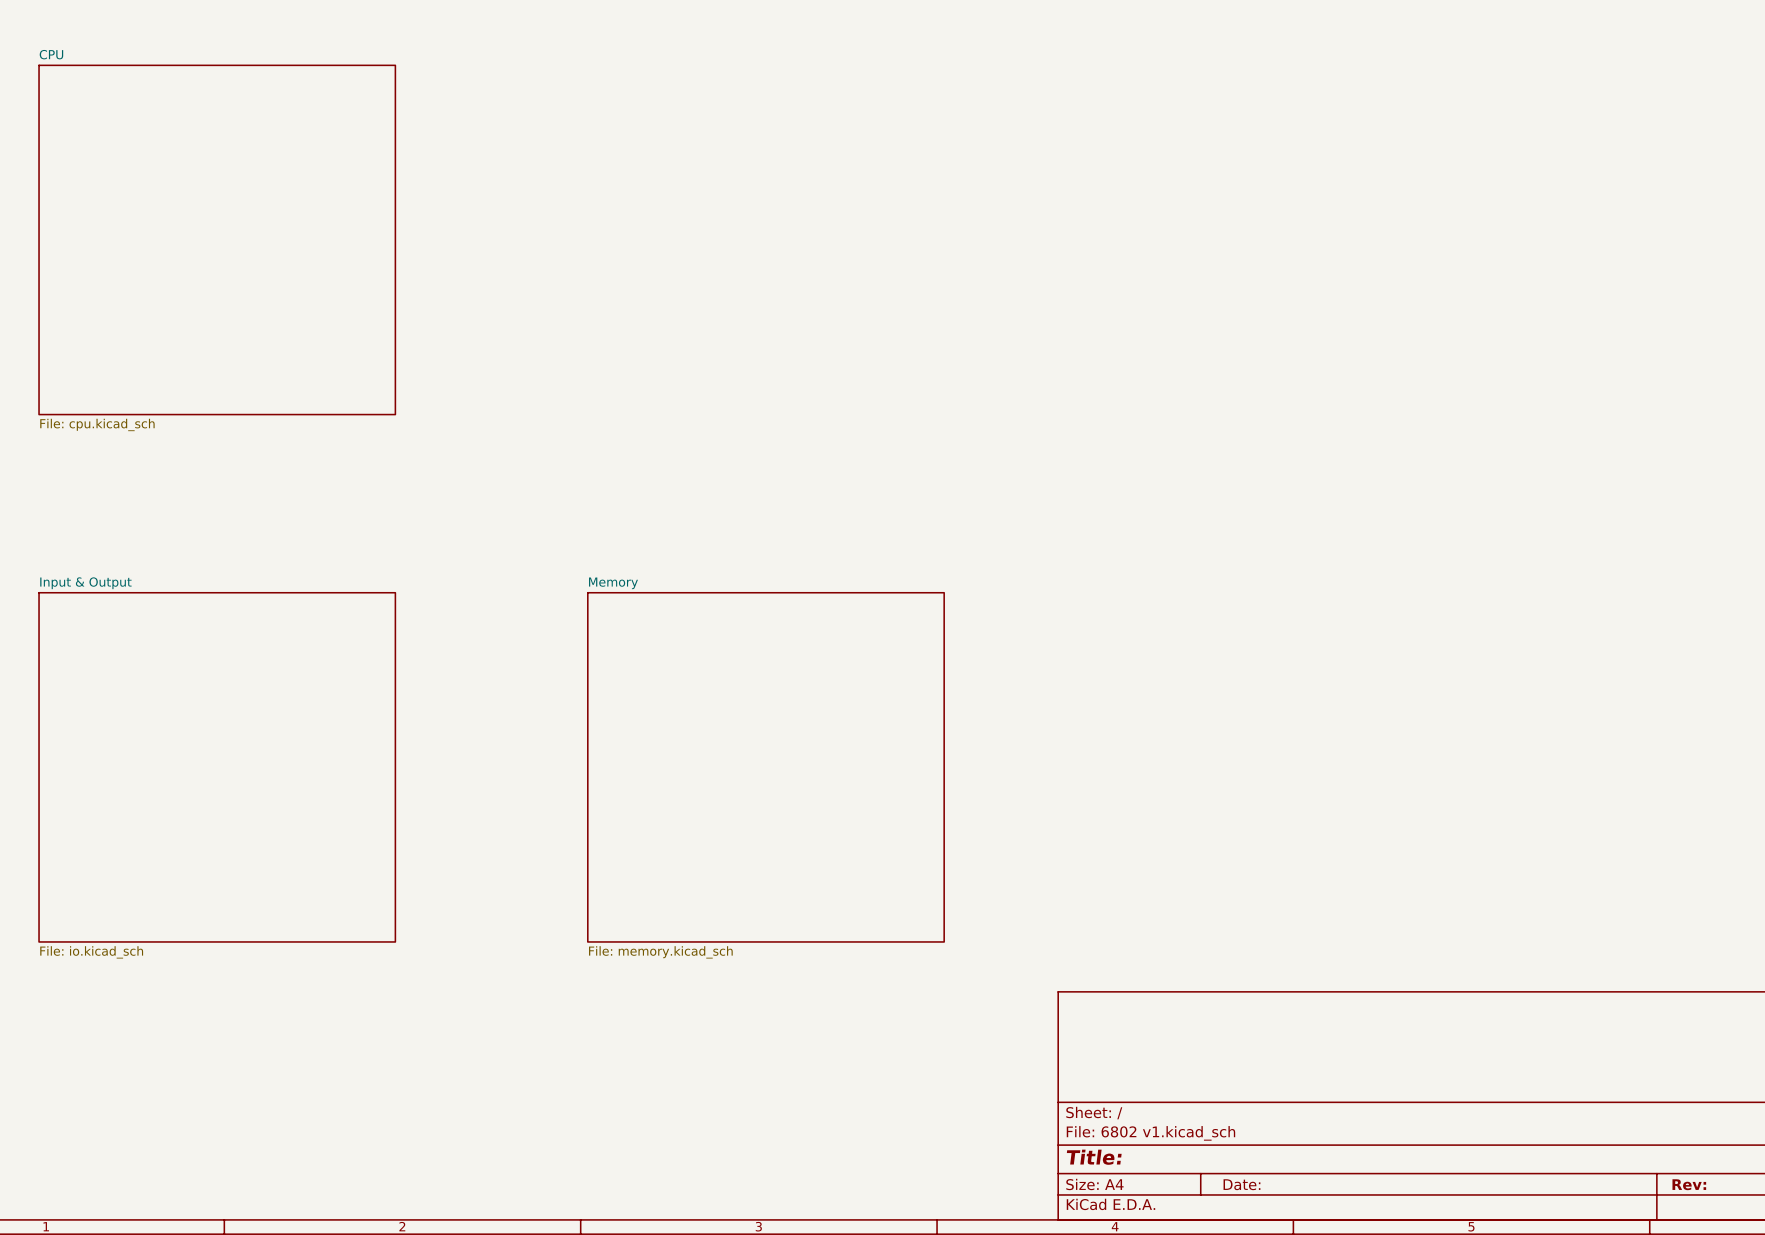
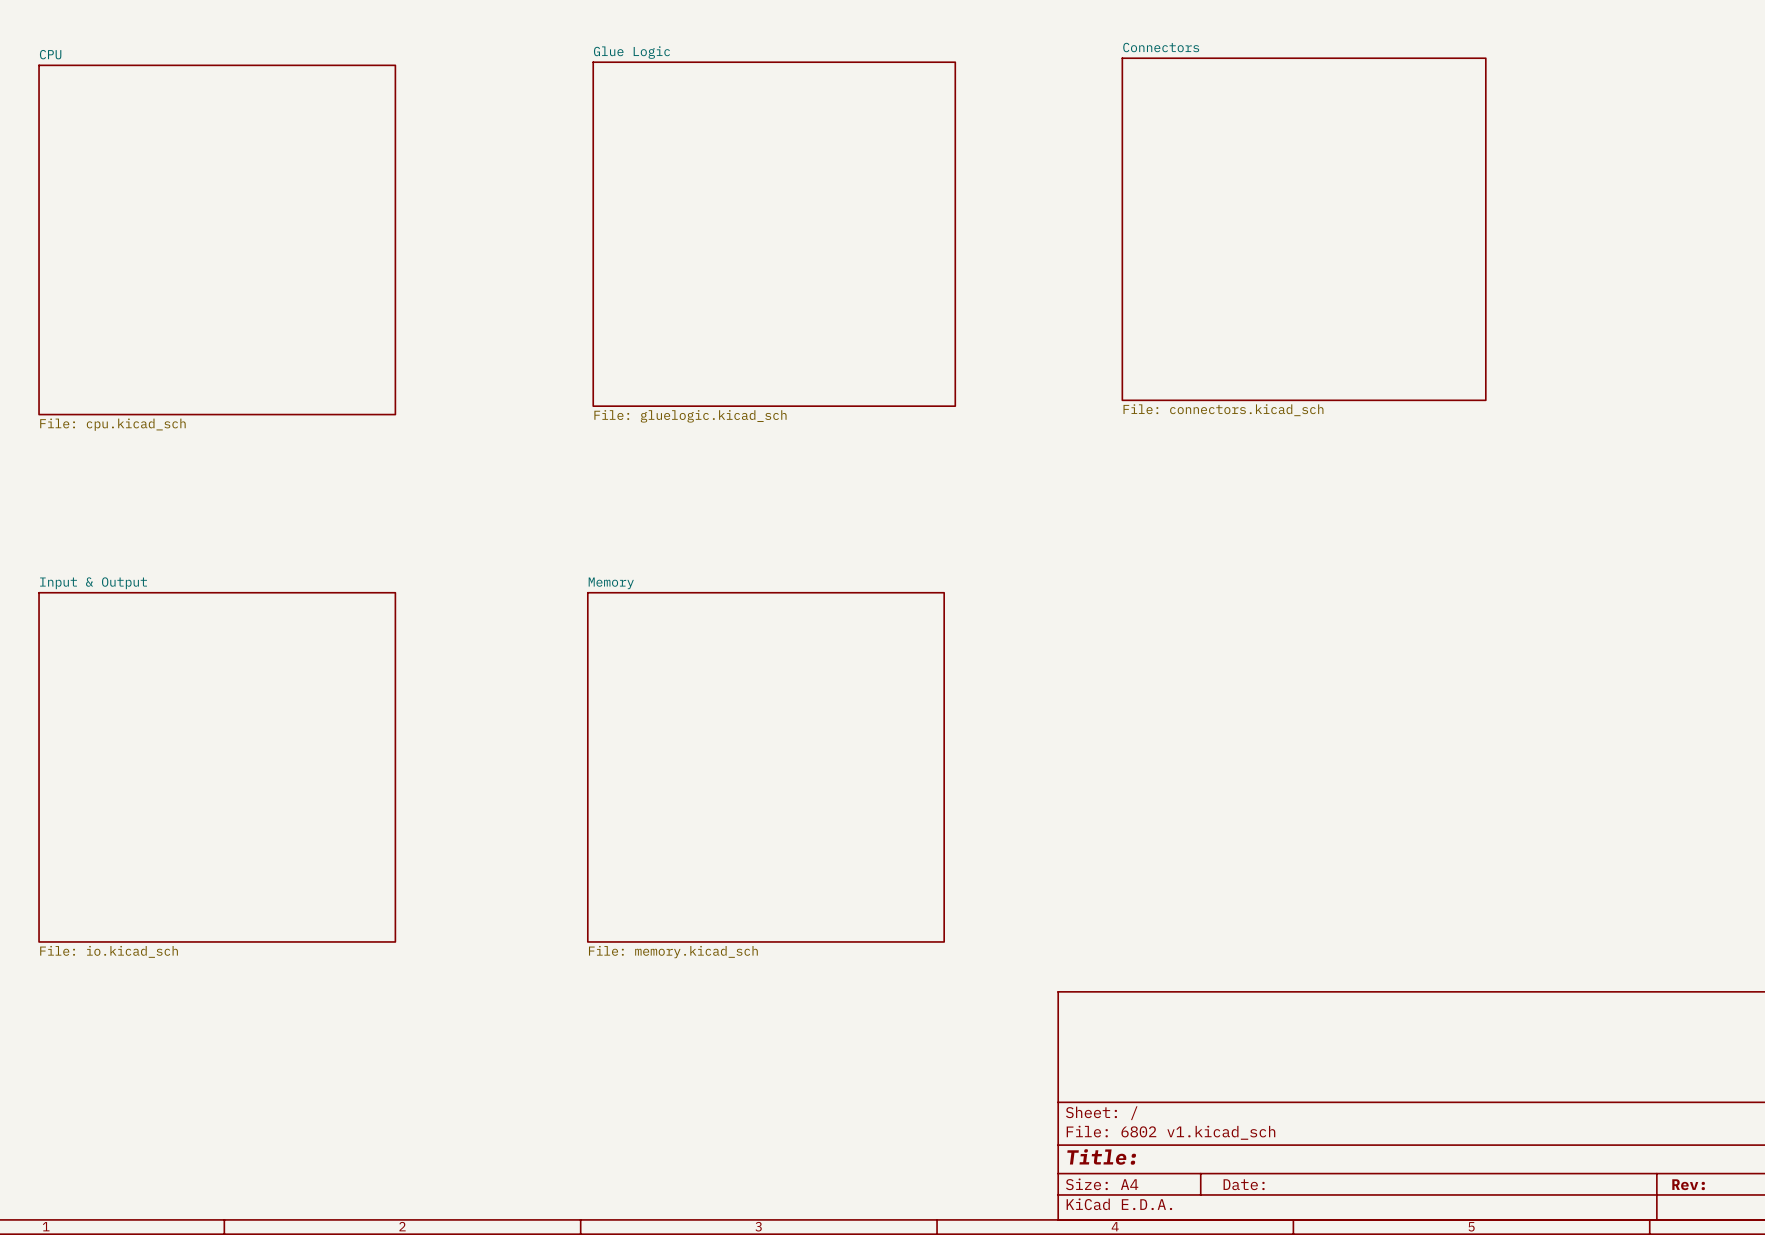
sheet Connectors: none -> File: connectors.kicad_sch (1304, 229)
sheet Glue Logic: none -> File: gluelogic.kicad_sch (774, 234)

